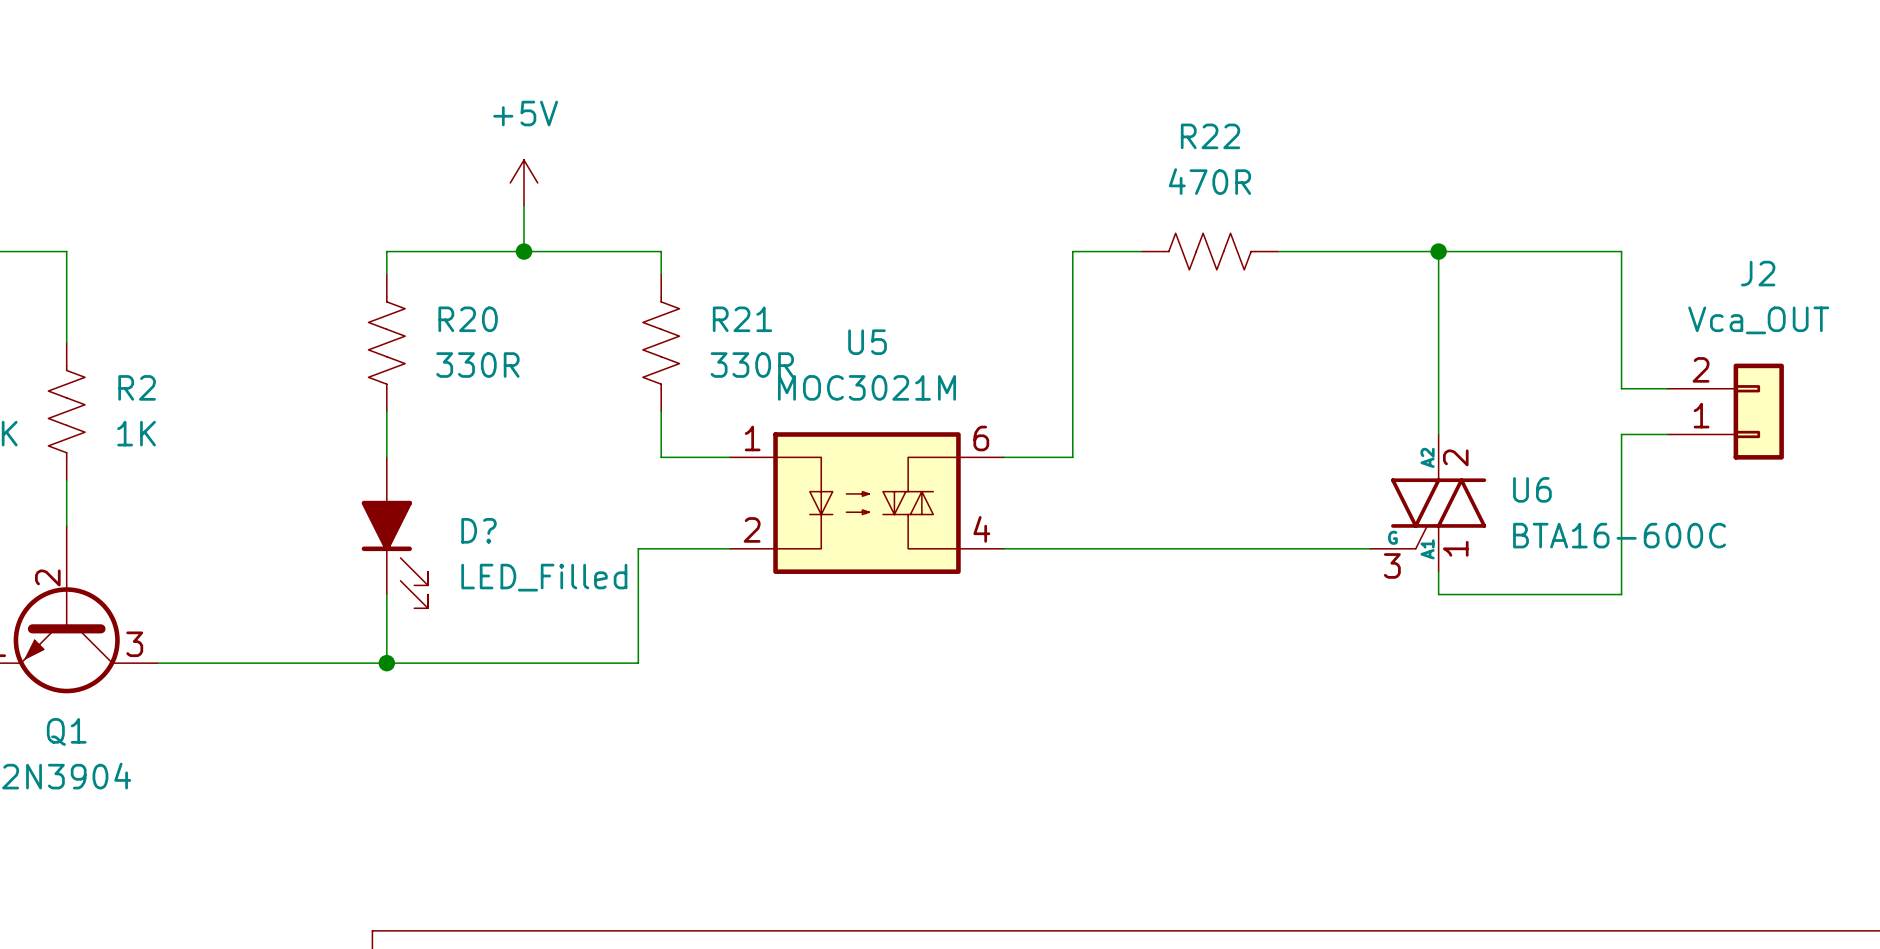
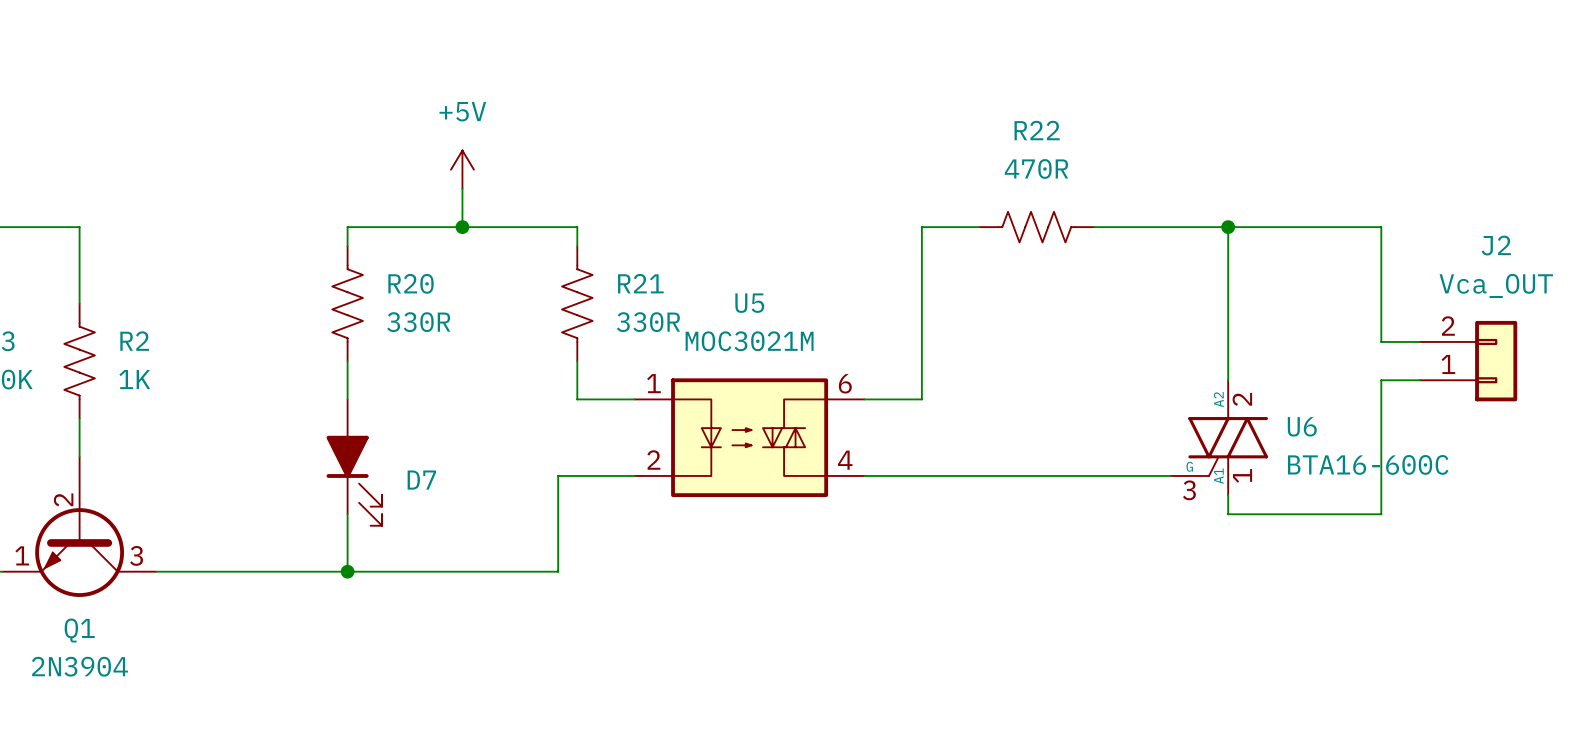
D? name: D? (478, 530) -> D7 (421, 480)
D? value: LED_Filled (544, 577) -> none

